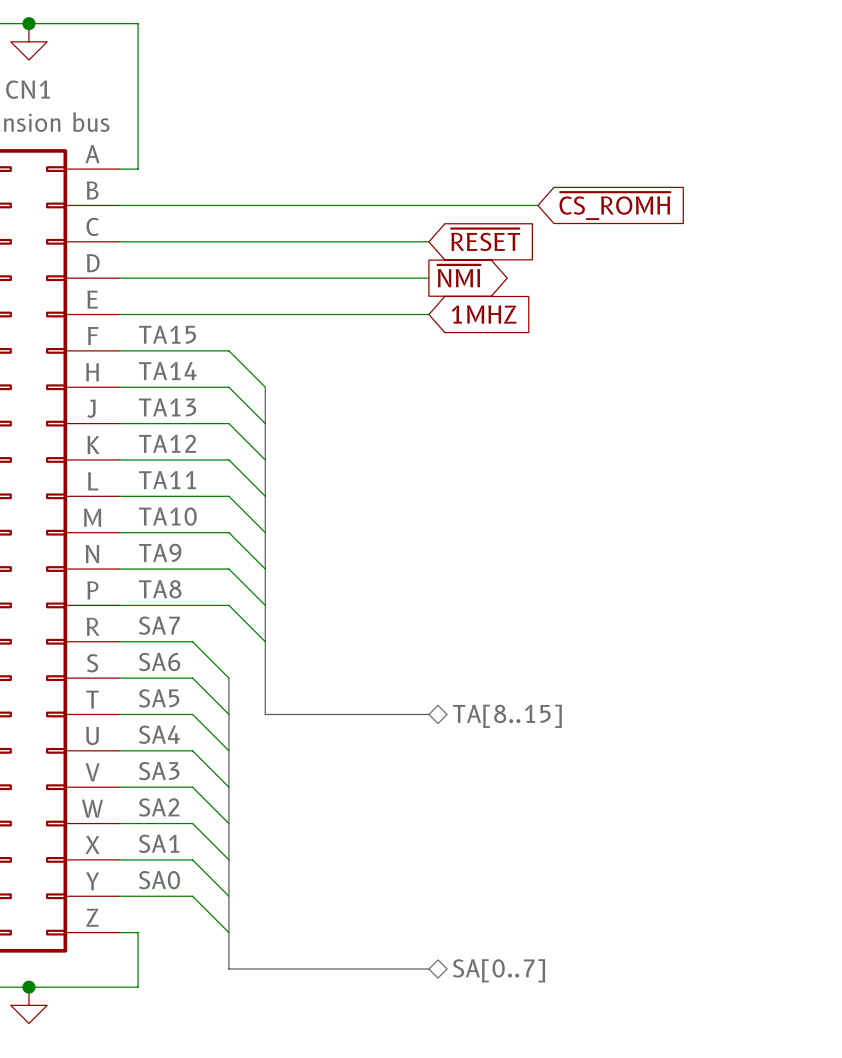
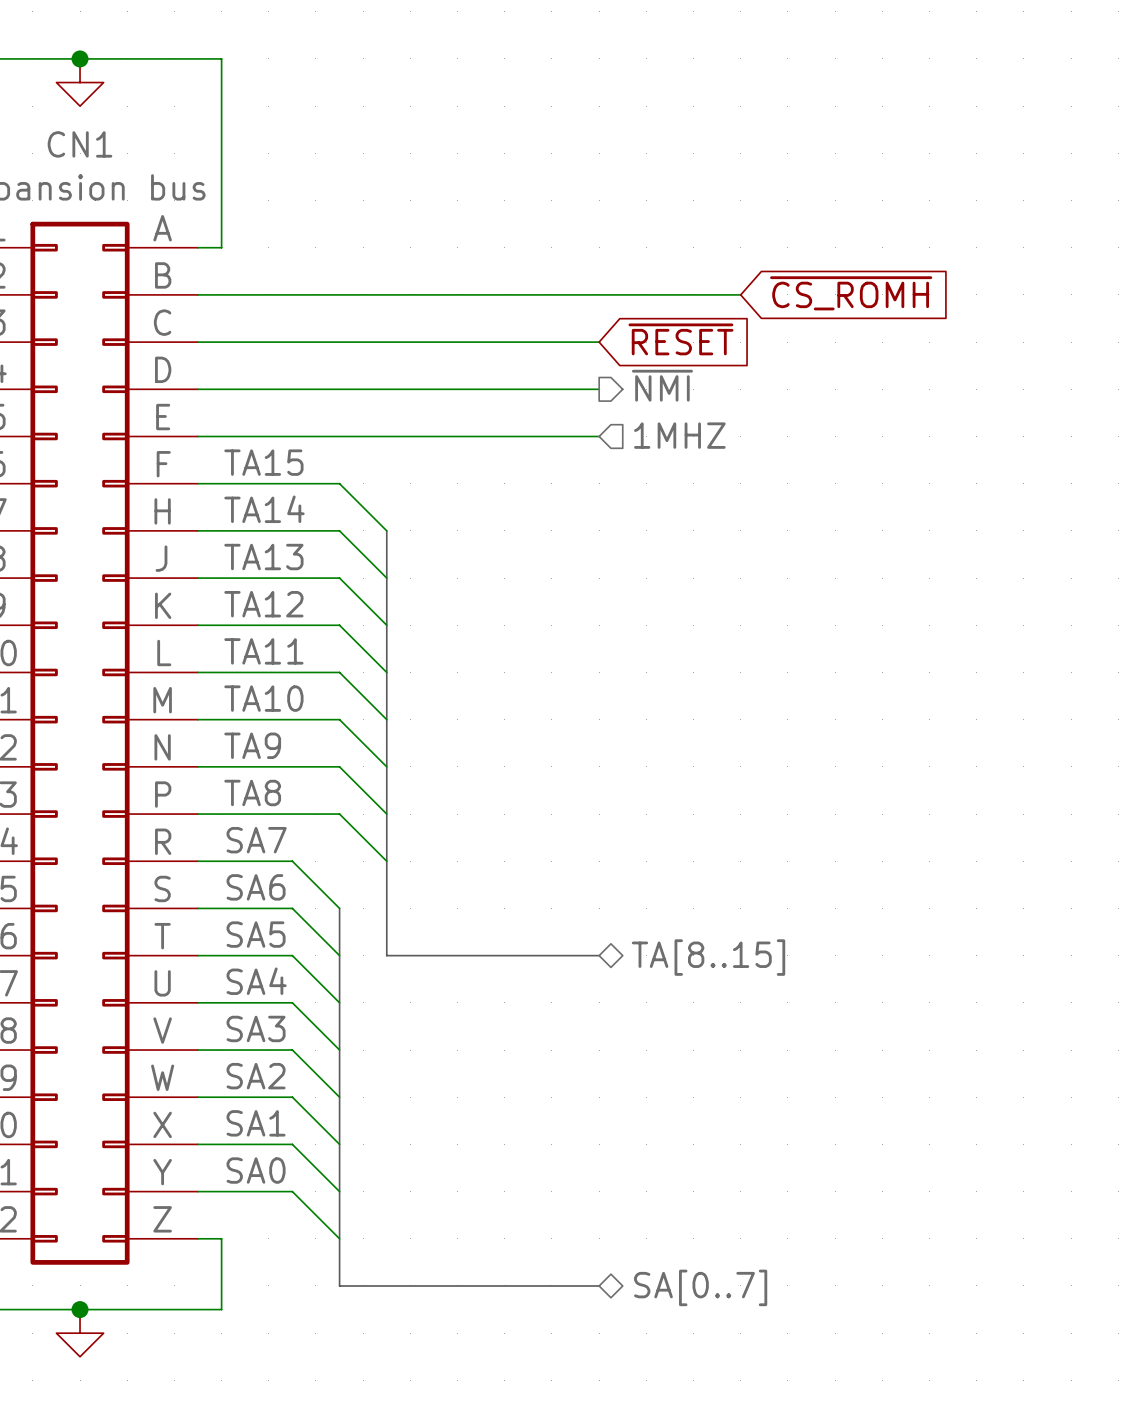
hierarchical label: none -> ~{NMI} (662, 385)
global label: ~{NMI} (459, 276) -> none
hierarchical label: none -> 1MHZ (679, 435)
global label: 1MHZ (484, 314) -> none

